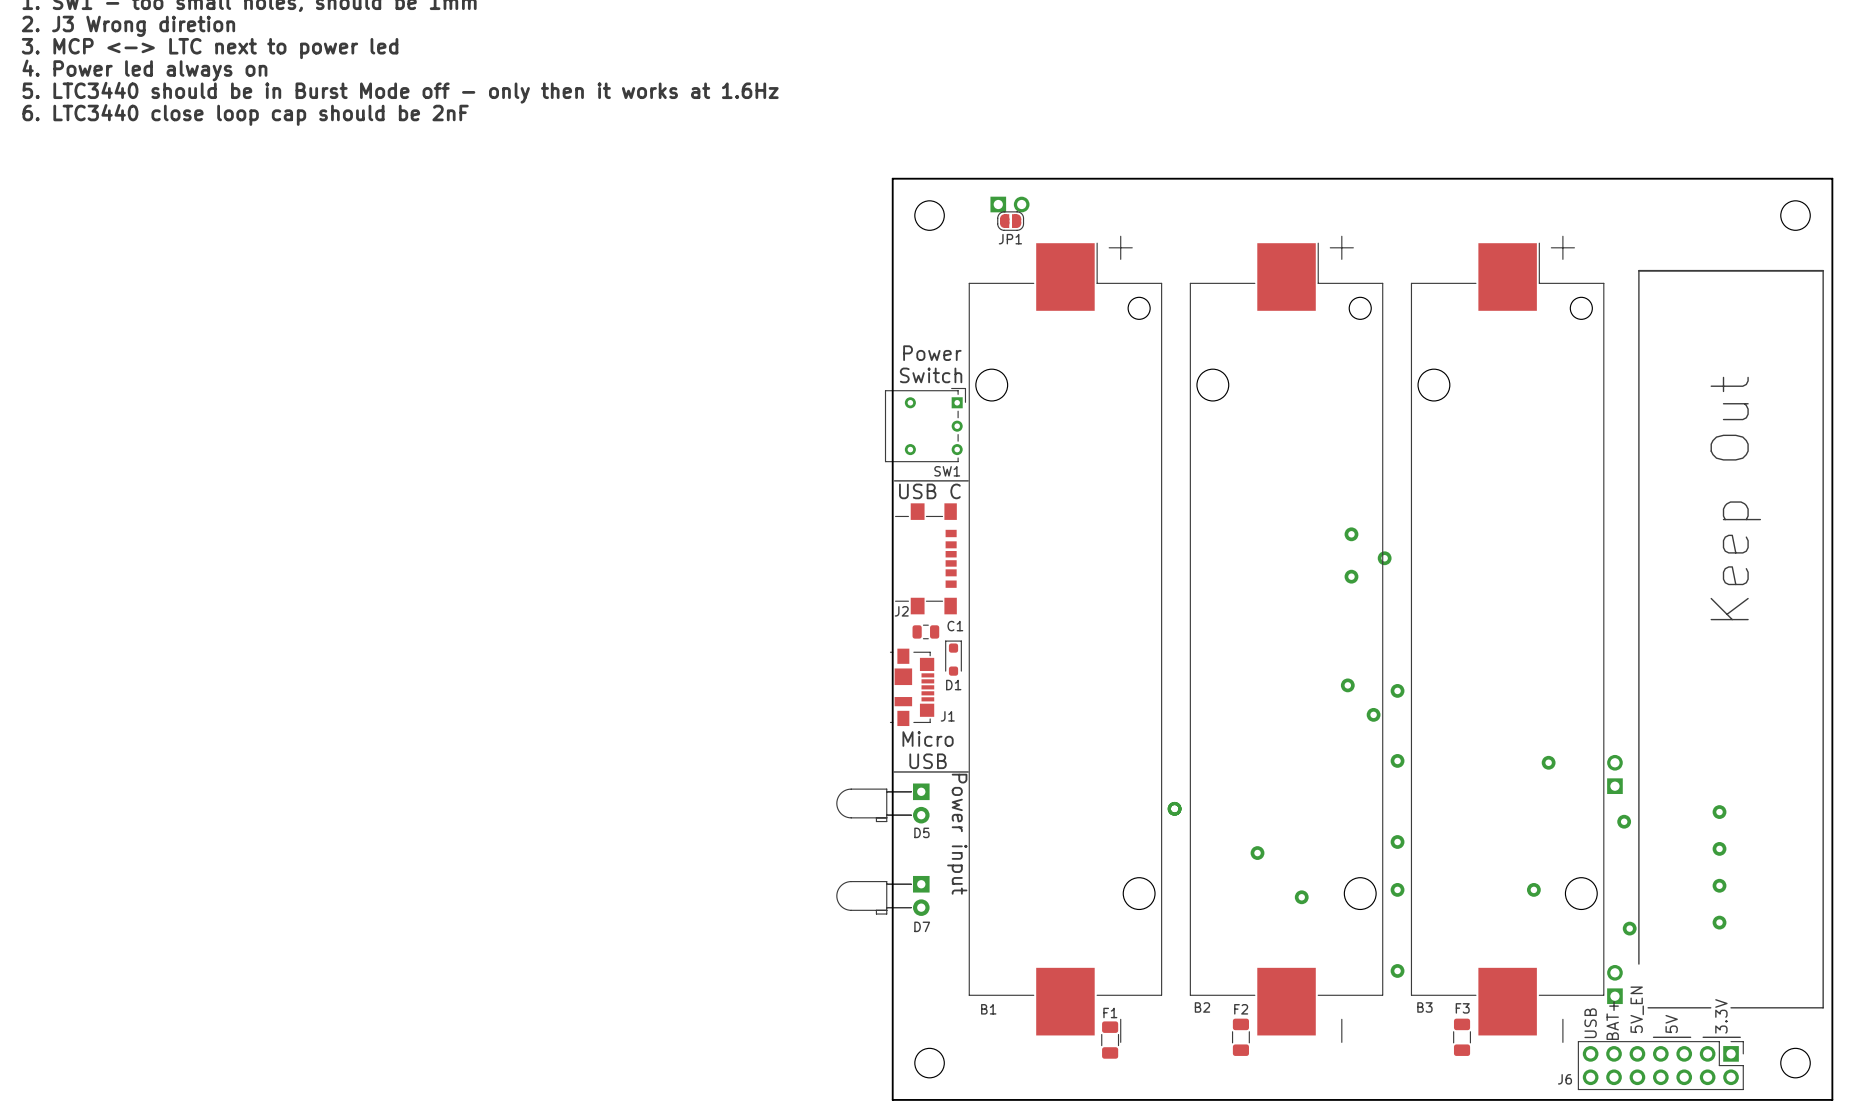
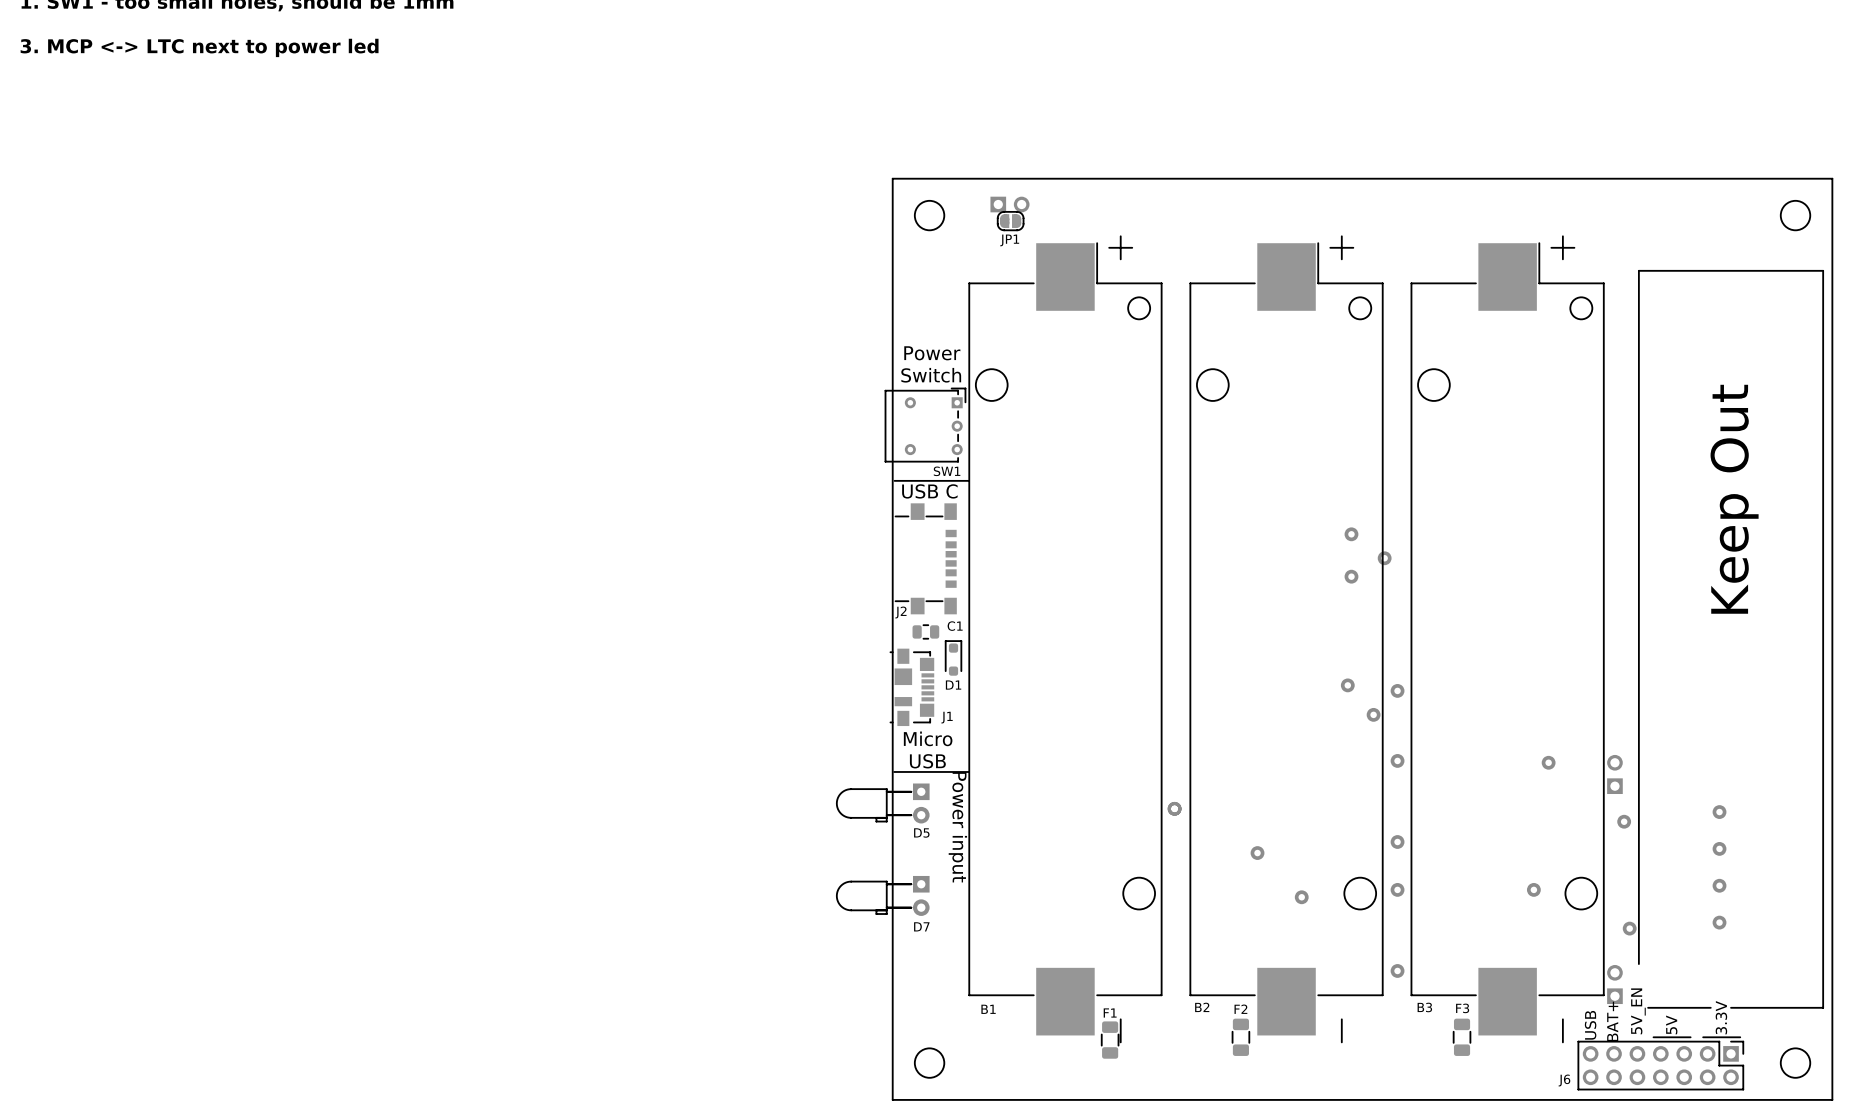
text: 2. J3 Wrong diretion (128, 26) -> none
text: 4. Power led always on (144, 70) -> none
text: 5. LTC3440 should be in Burst Mode off - only then it works at 1.6Hz (400, 92) -> none
text: 6. LTC3440 close loop cap should be 2nF (245, 114) -> none

